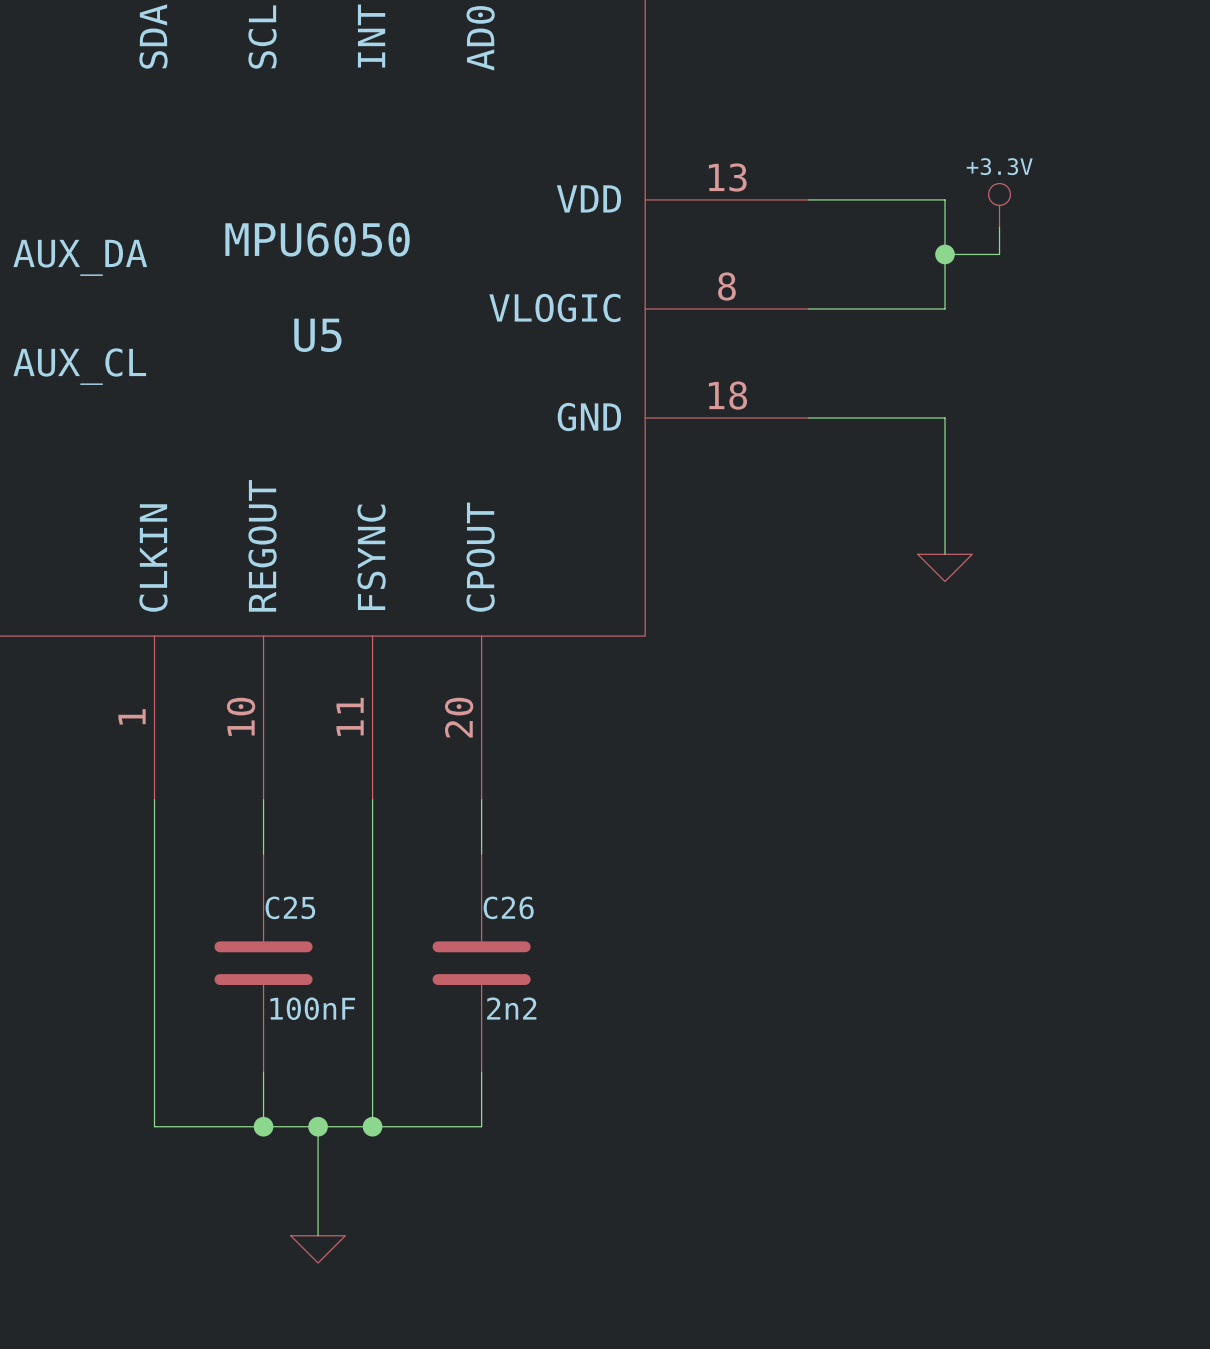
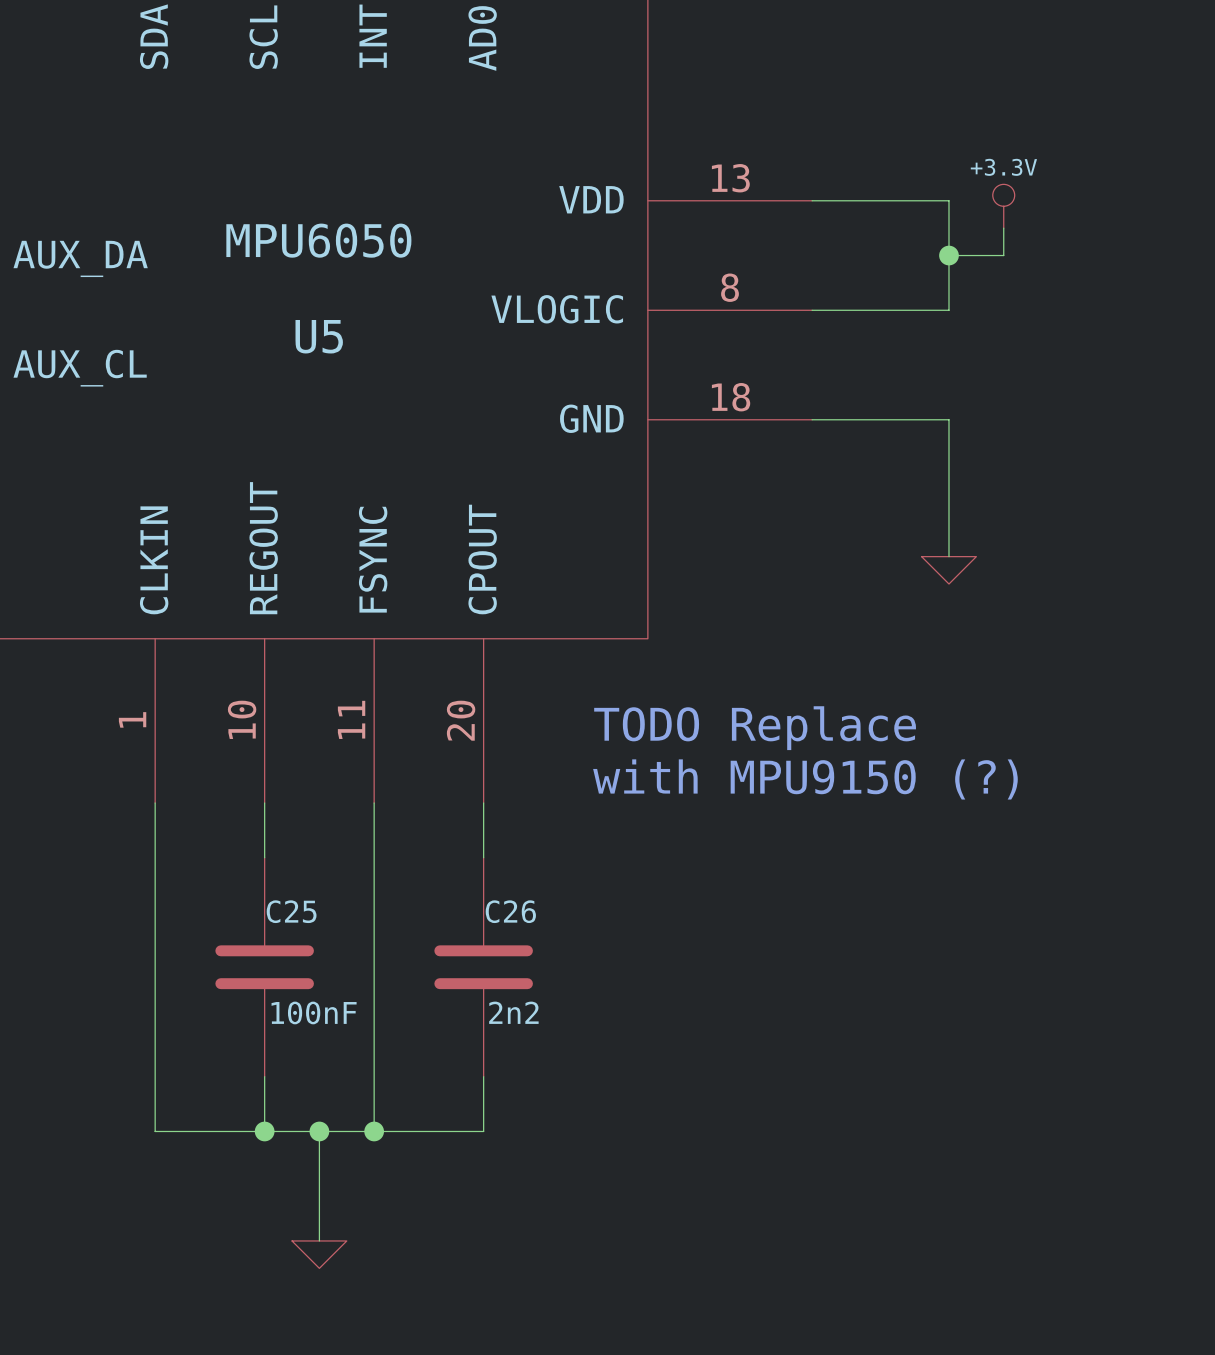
text: none -> TODO Replace (755, 728)
text: none -> with MPU9150 (?) (805, 779)

